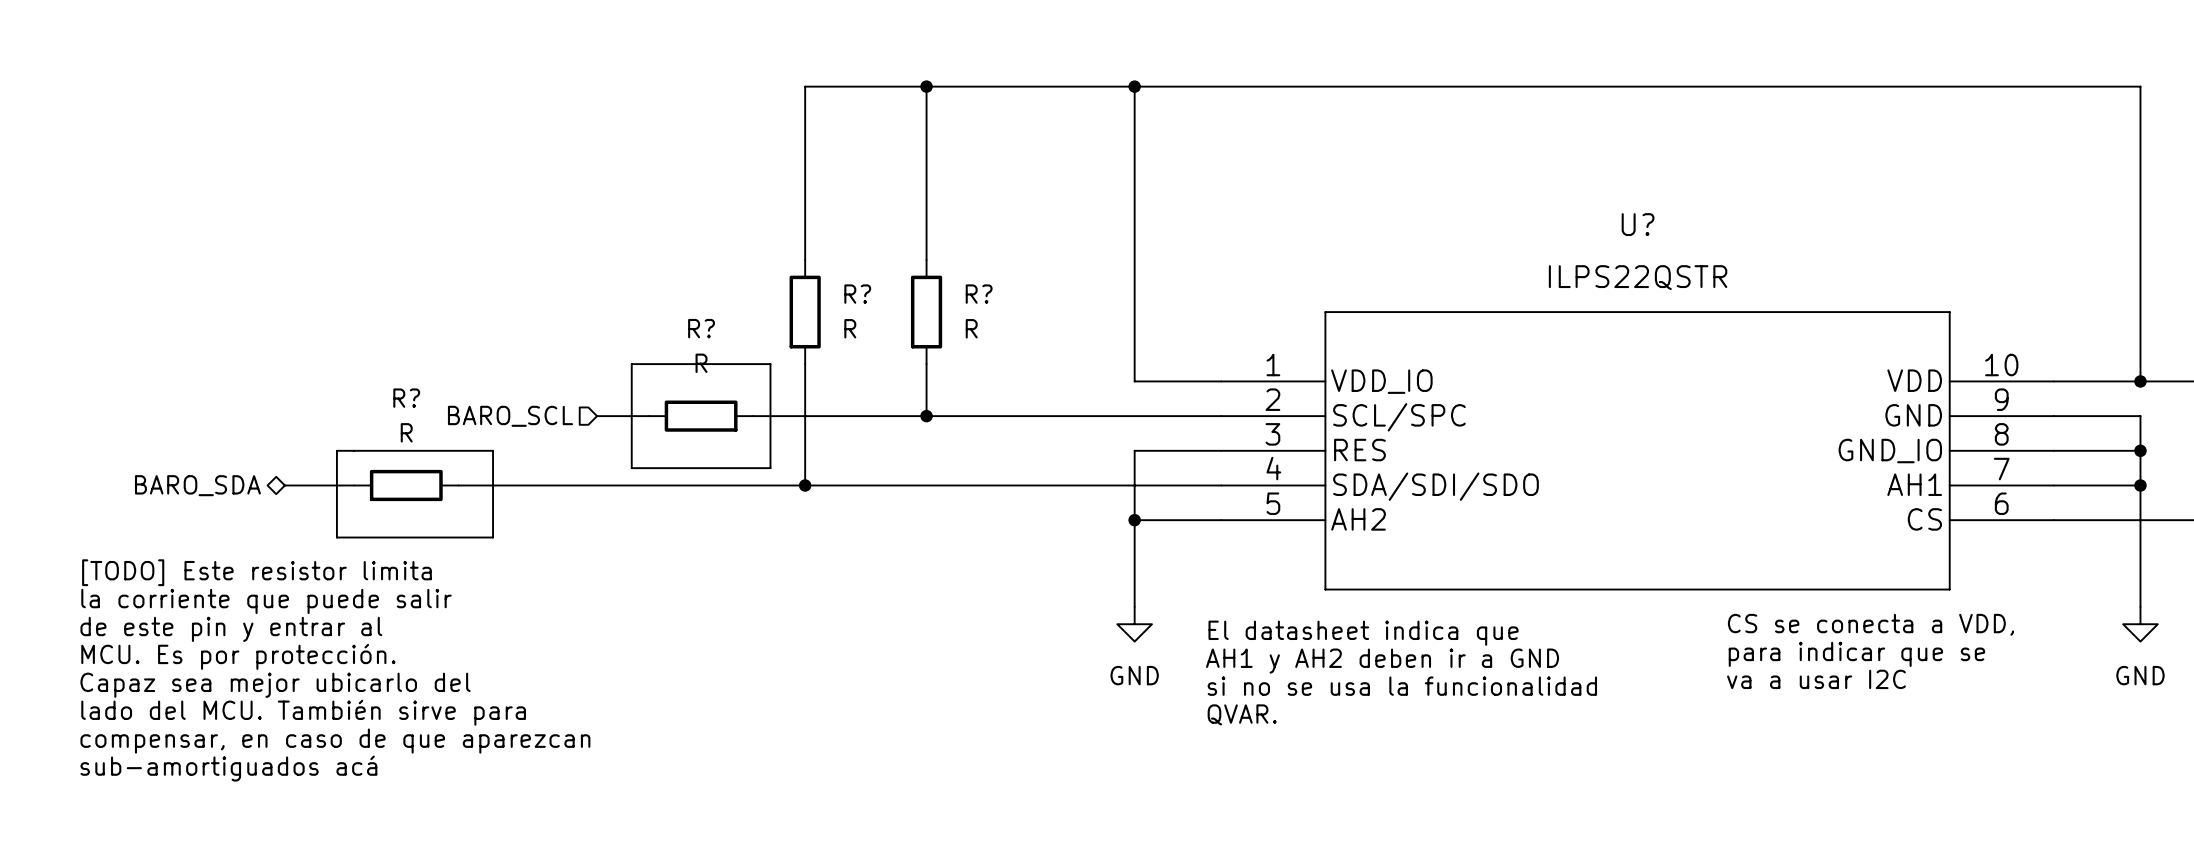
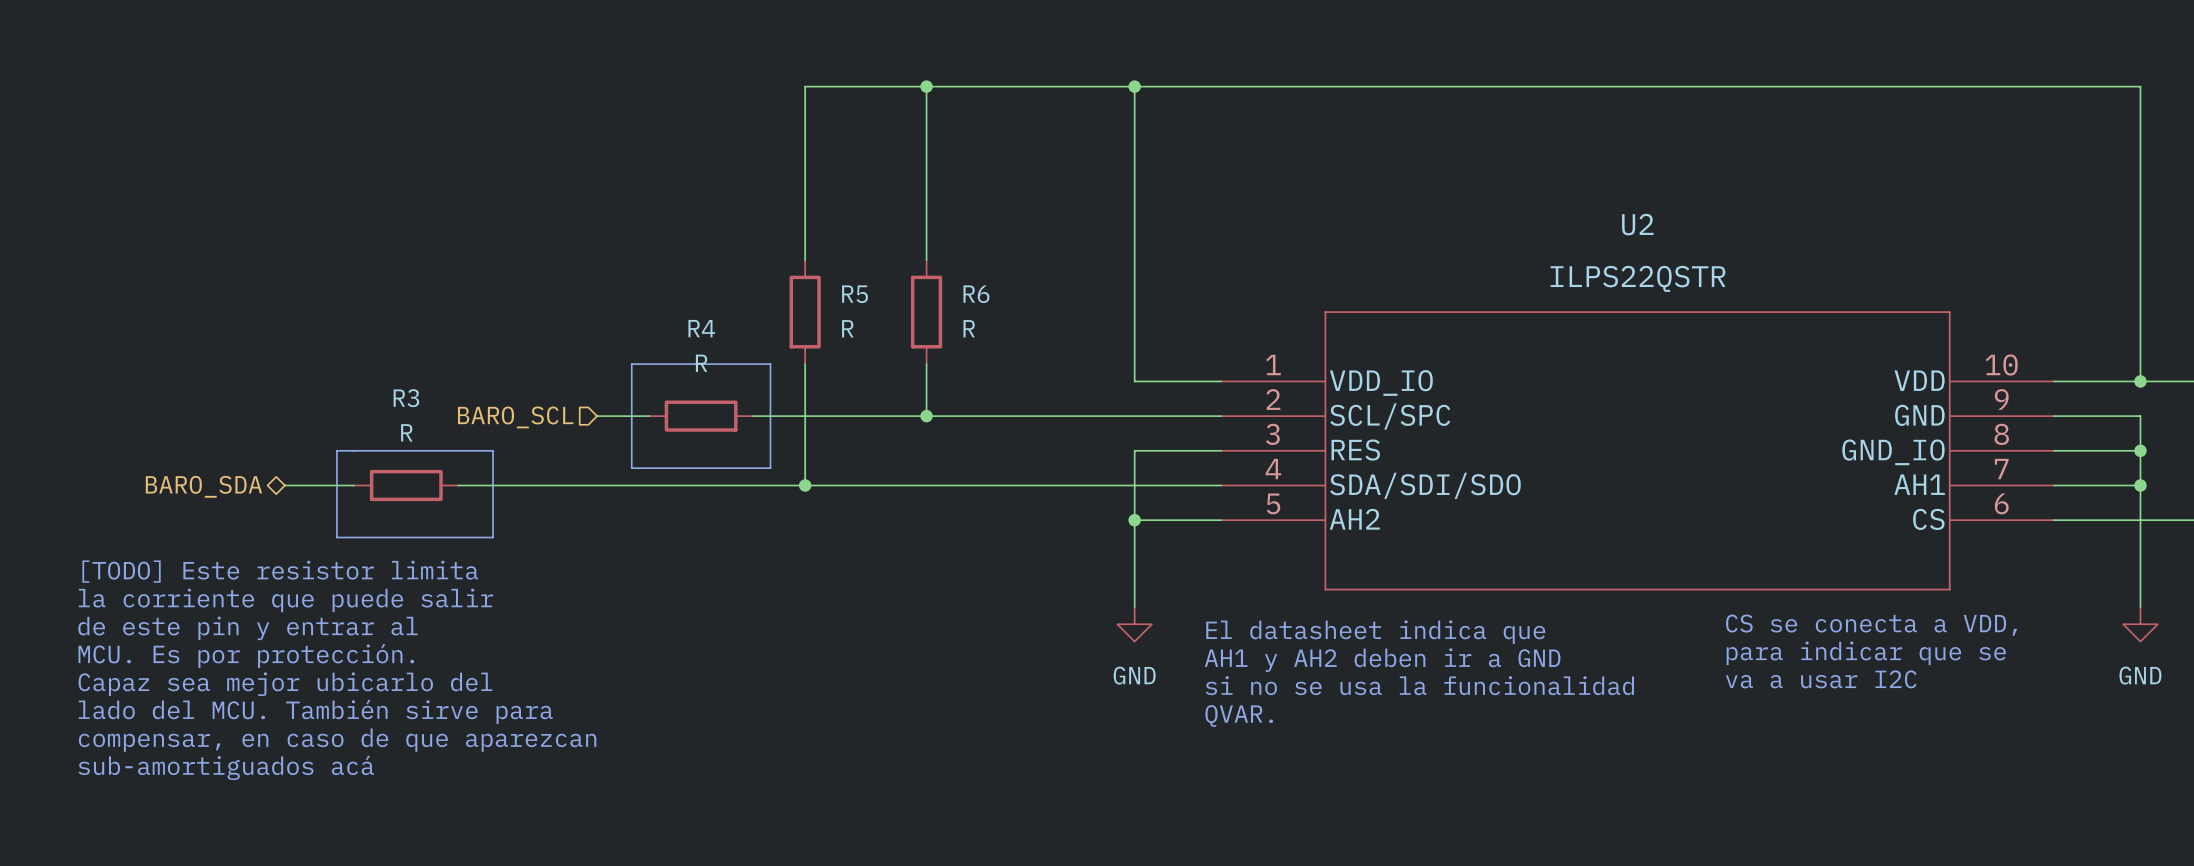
U? name: U? (1638, 224) -> U2 (1637, 224)
R? name: R? (857, 294) -> R5 (855, 294)
R? name: R? (979, 294) -> R6 (976, 294)
R? name: R? (701, 328) -> R4 (701, 328)
R? name: R? (406, 398) -> R3 (406, 398)

